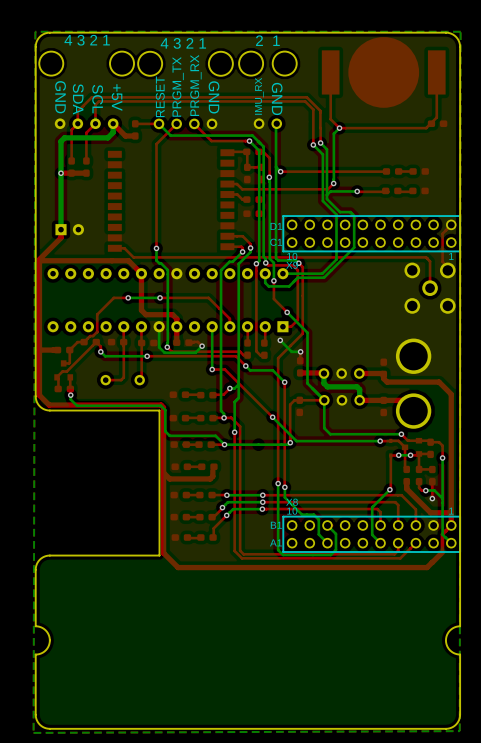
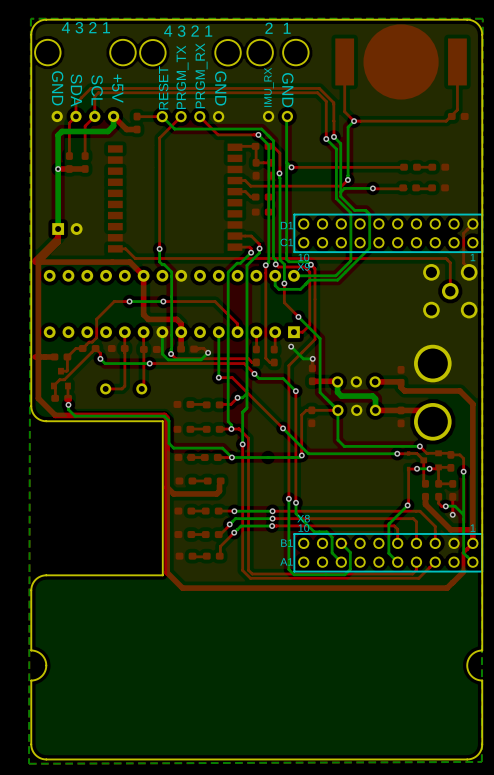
top track: (39, 260) (39, 395) (49, 405) (58, 405) -> (58, 237) (58, 242) (38, 262) (38, 398) (55, 415)

